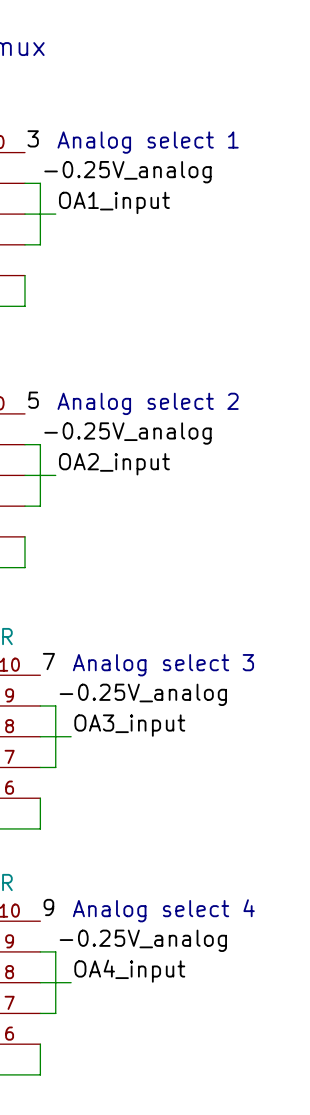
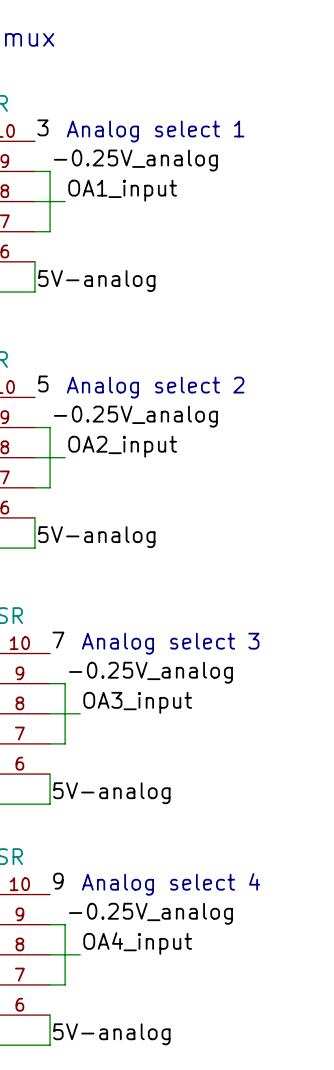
label: none -> 5V-analog (96, 281)
label: none -> 5V-analog (96, 537)
label: none -> 5V-analog (111, 793)
label: none -> 5V-analog (111, 1034)

